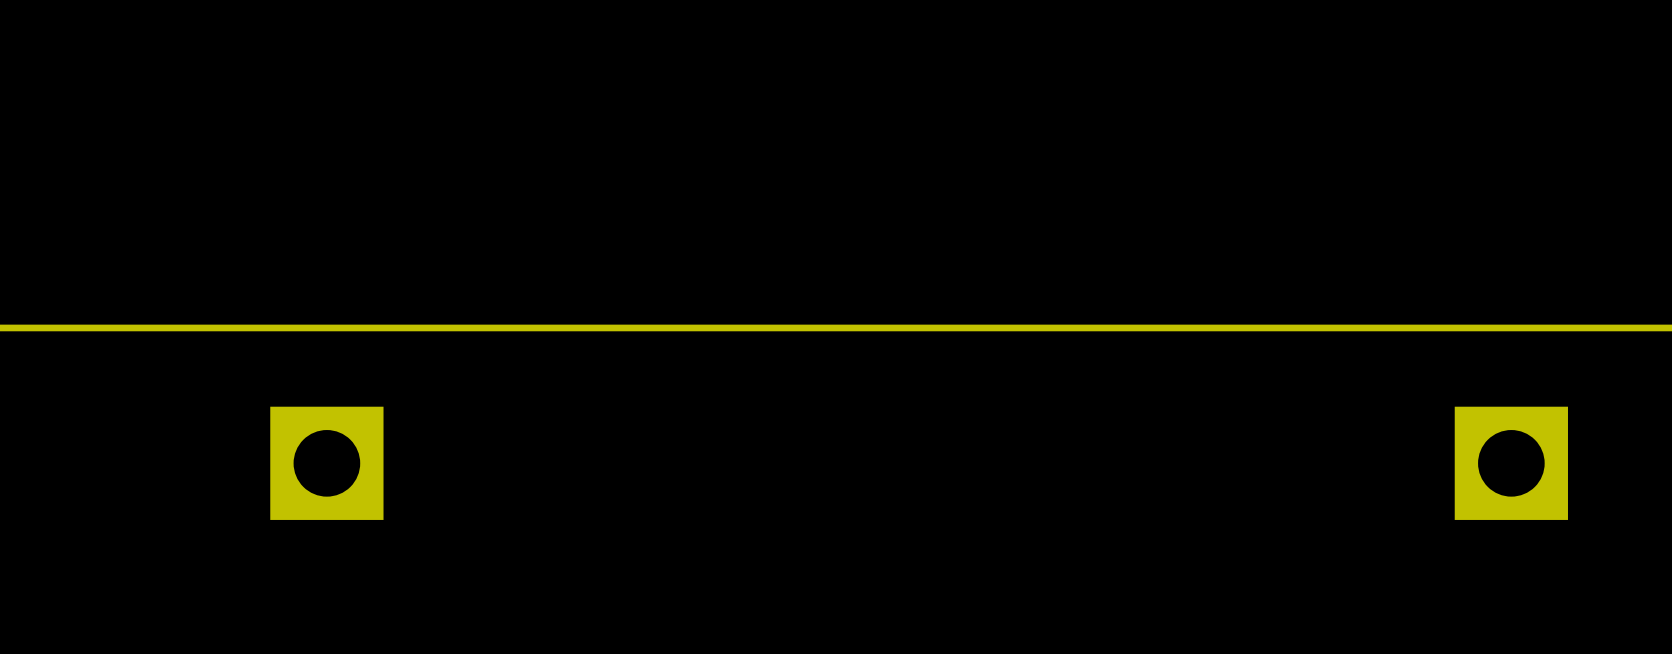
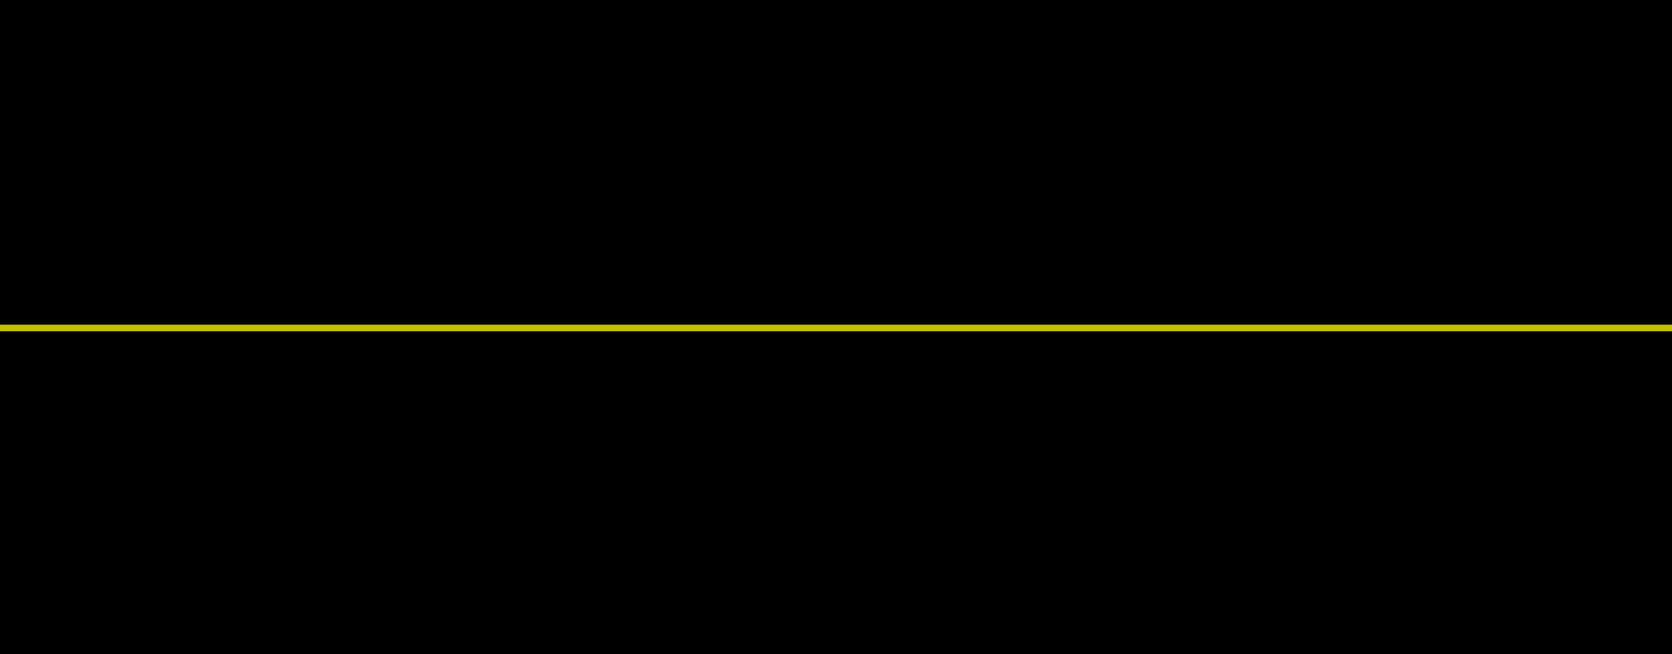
part: (326, 463) -> none
part: (1511, 463) -> none

